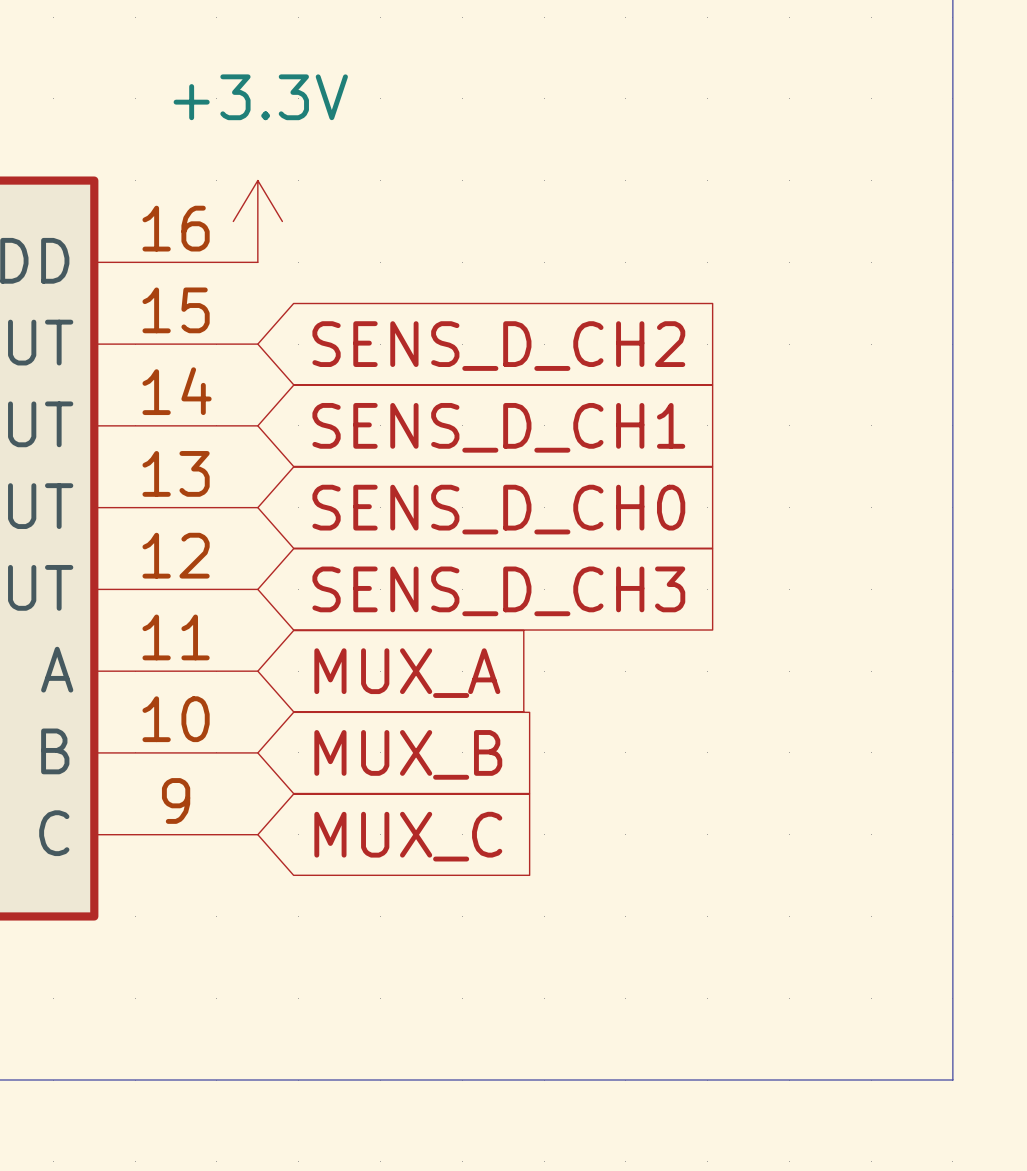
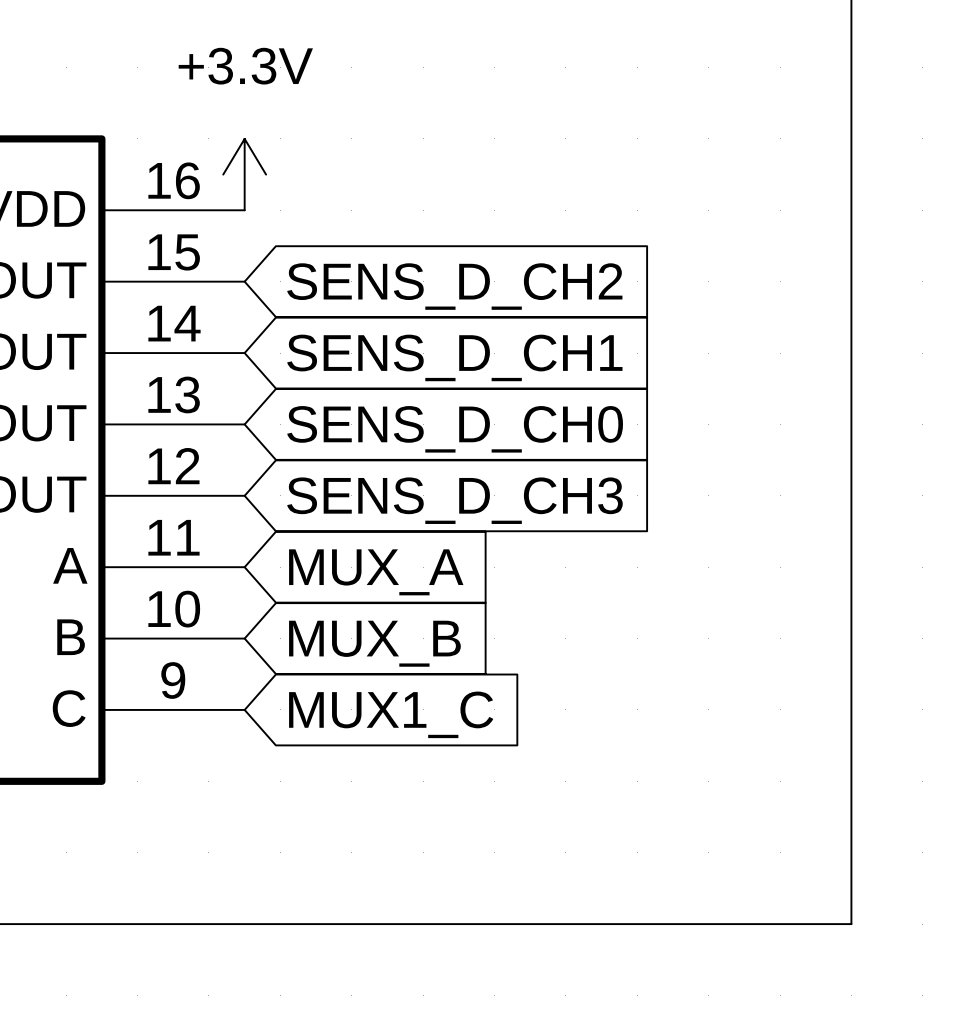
global label: MUX_C (408, 836) -> MUX1_C (391, 714)

